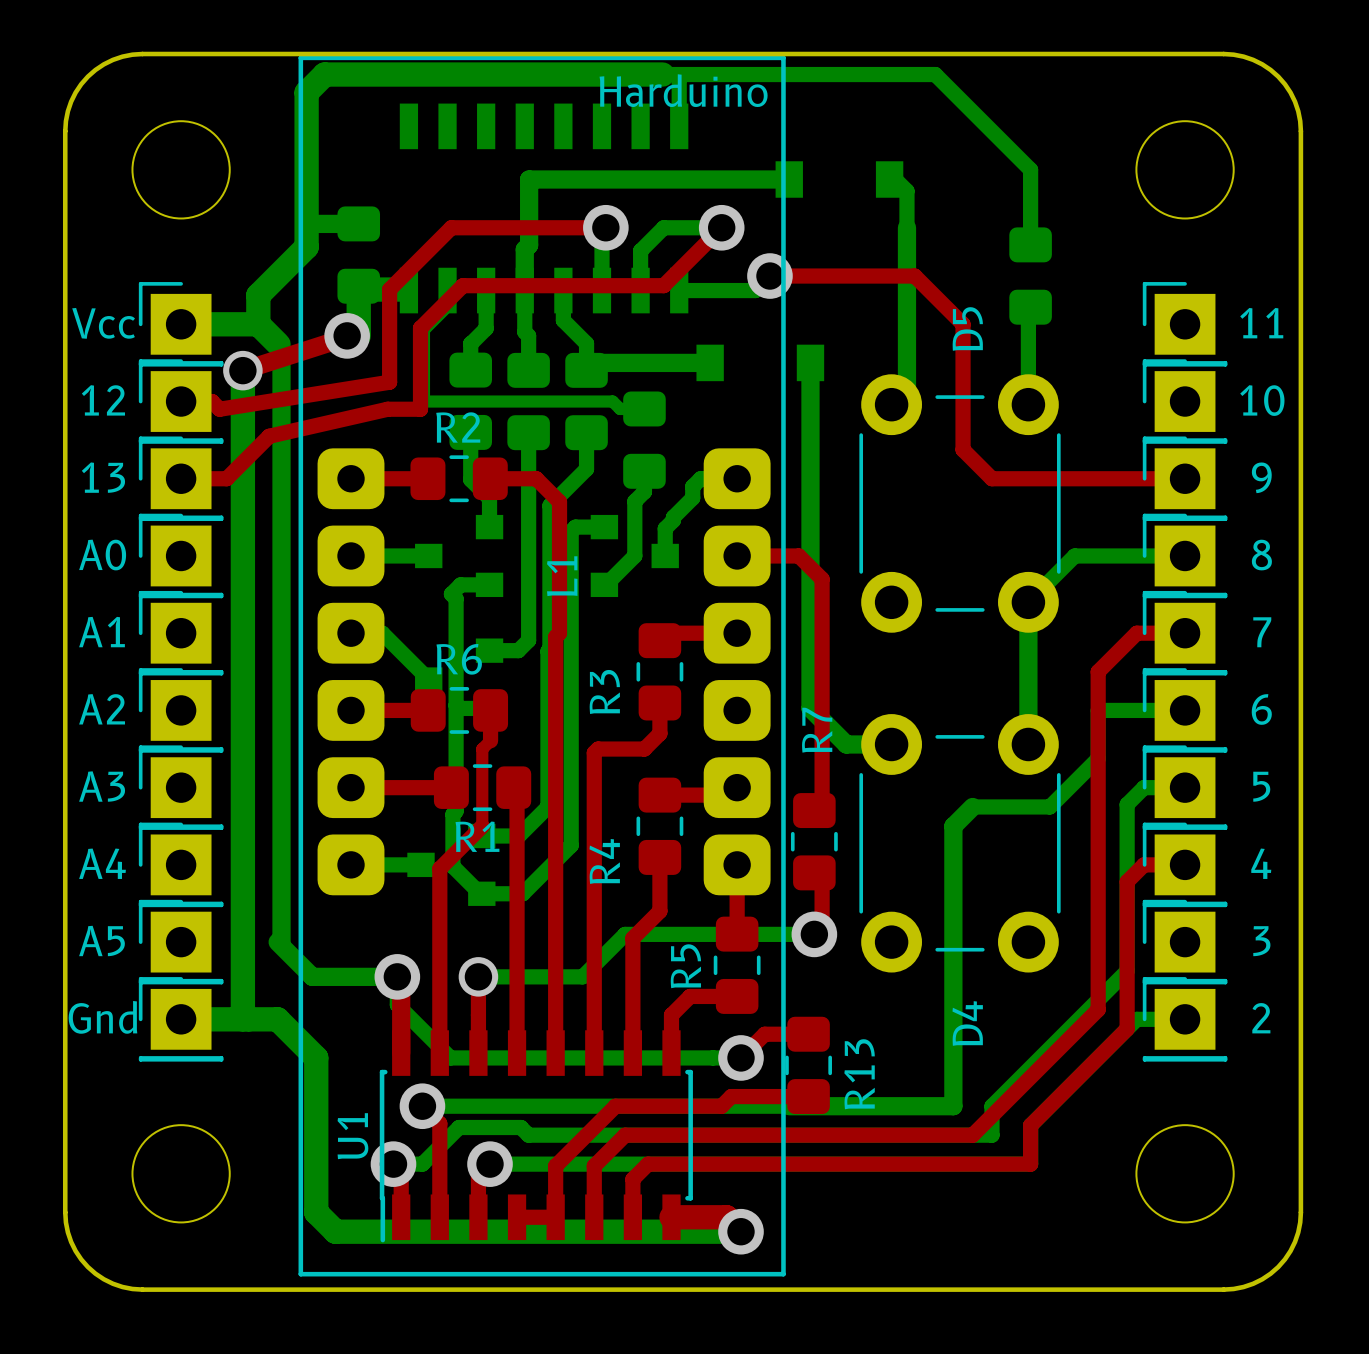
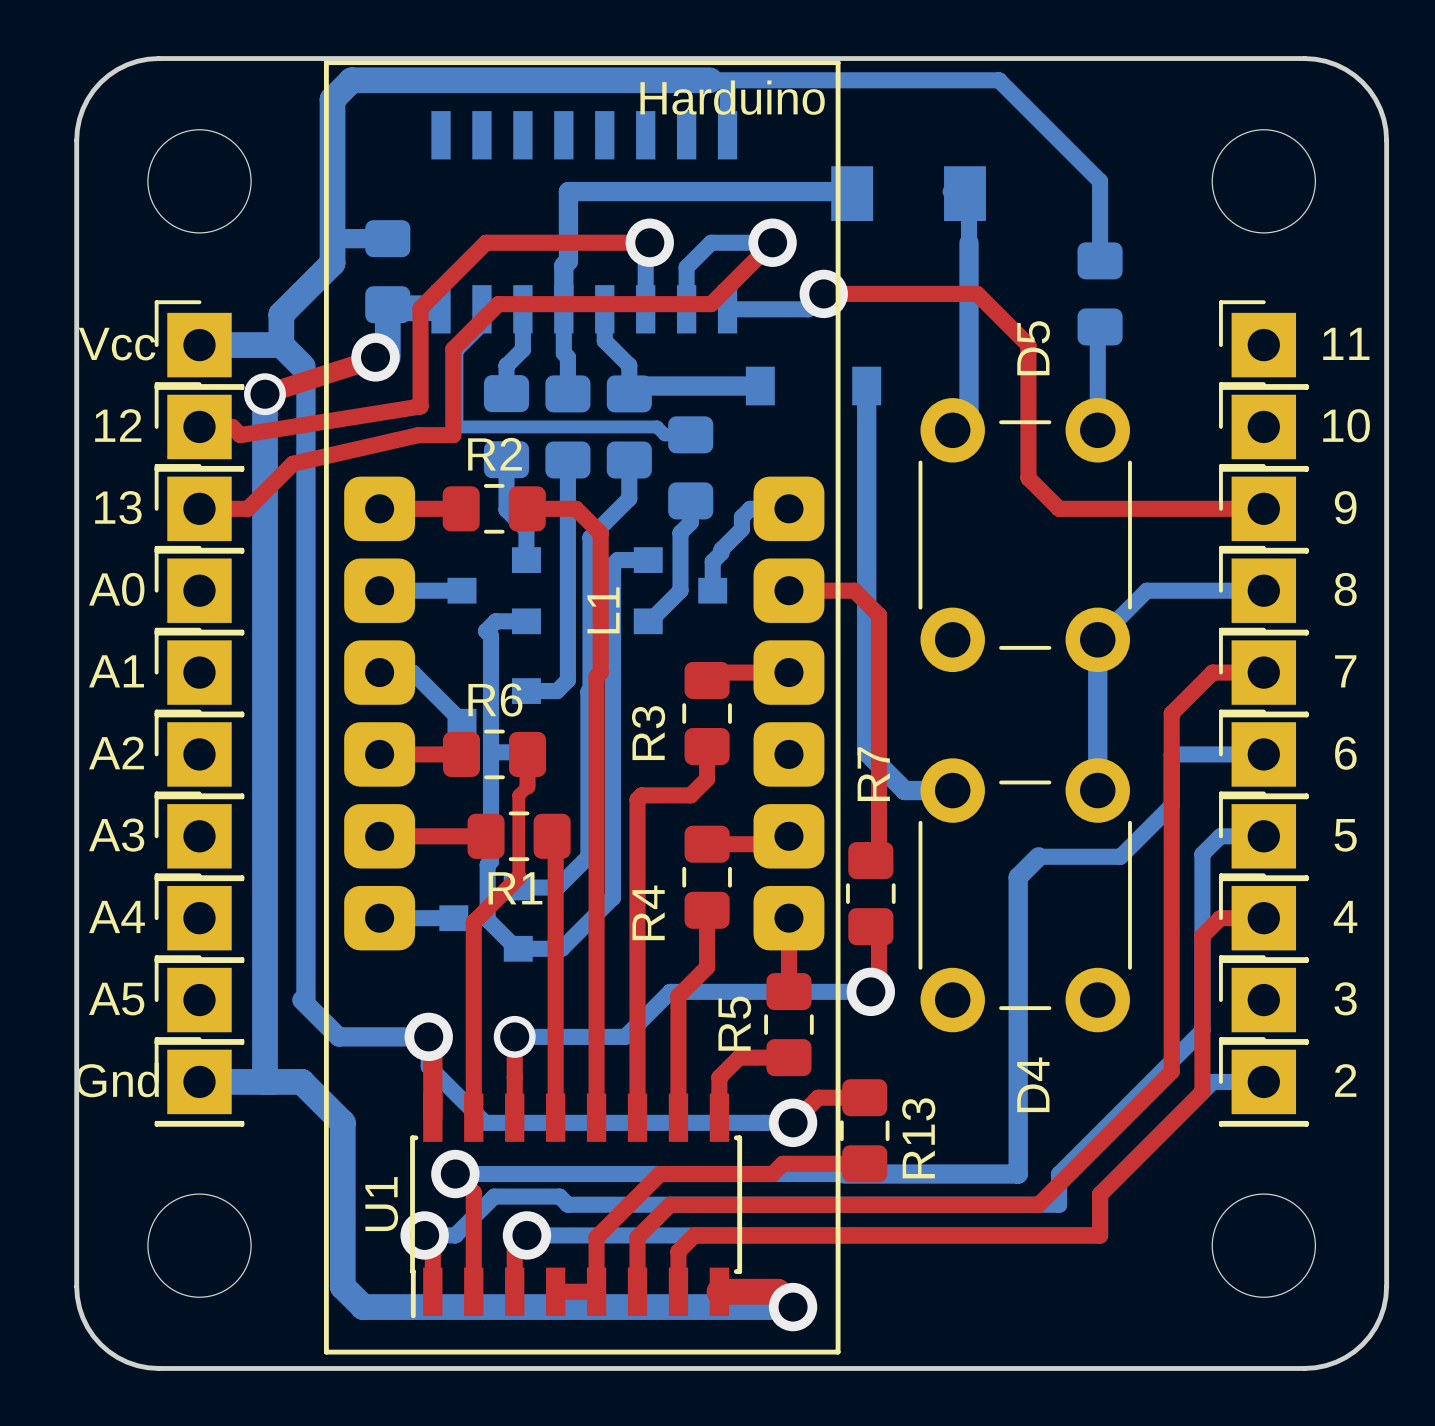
part footprint: [775, 161, 904, 198] -> [831, 166, 986, 222]

